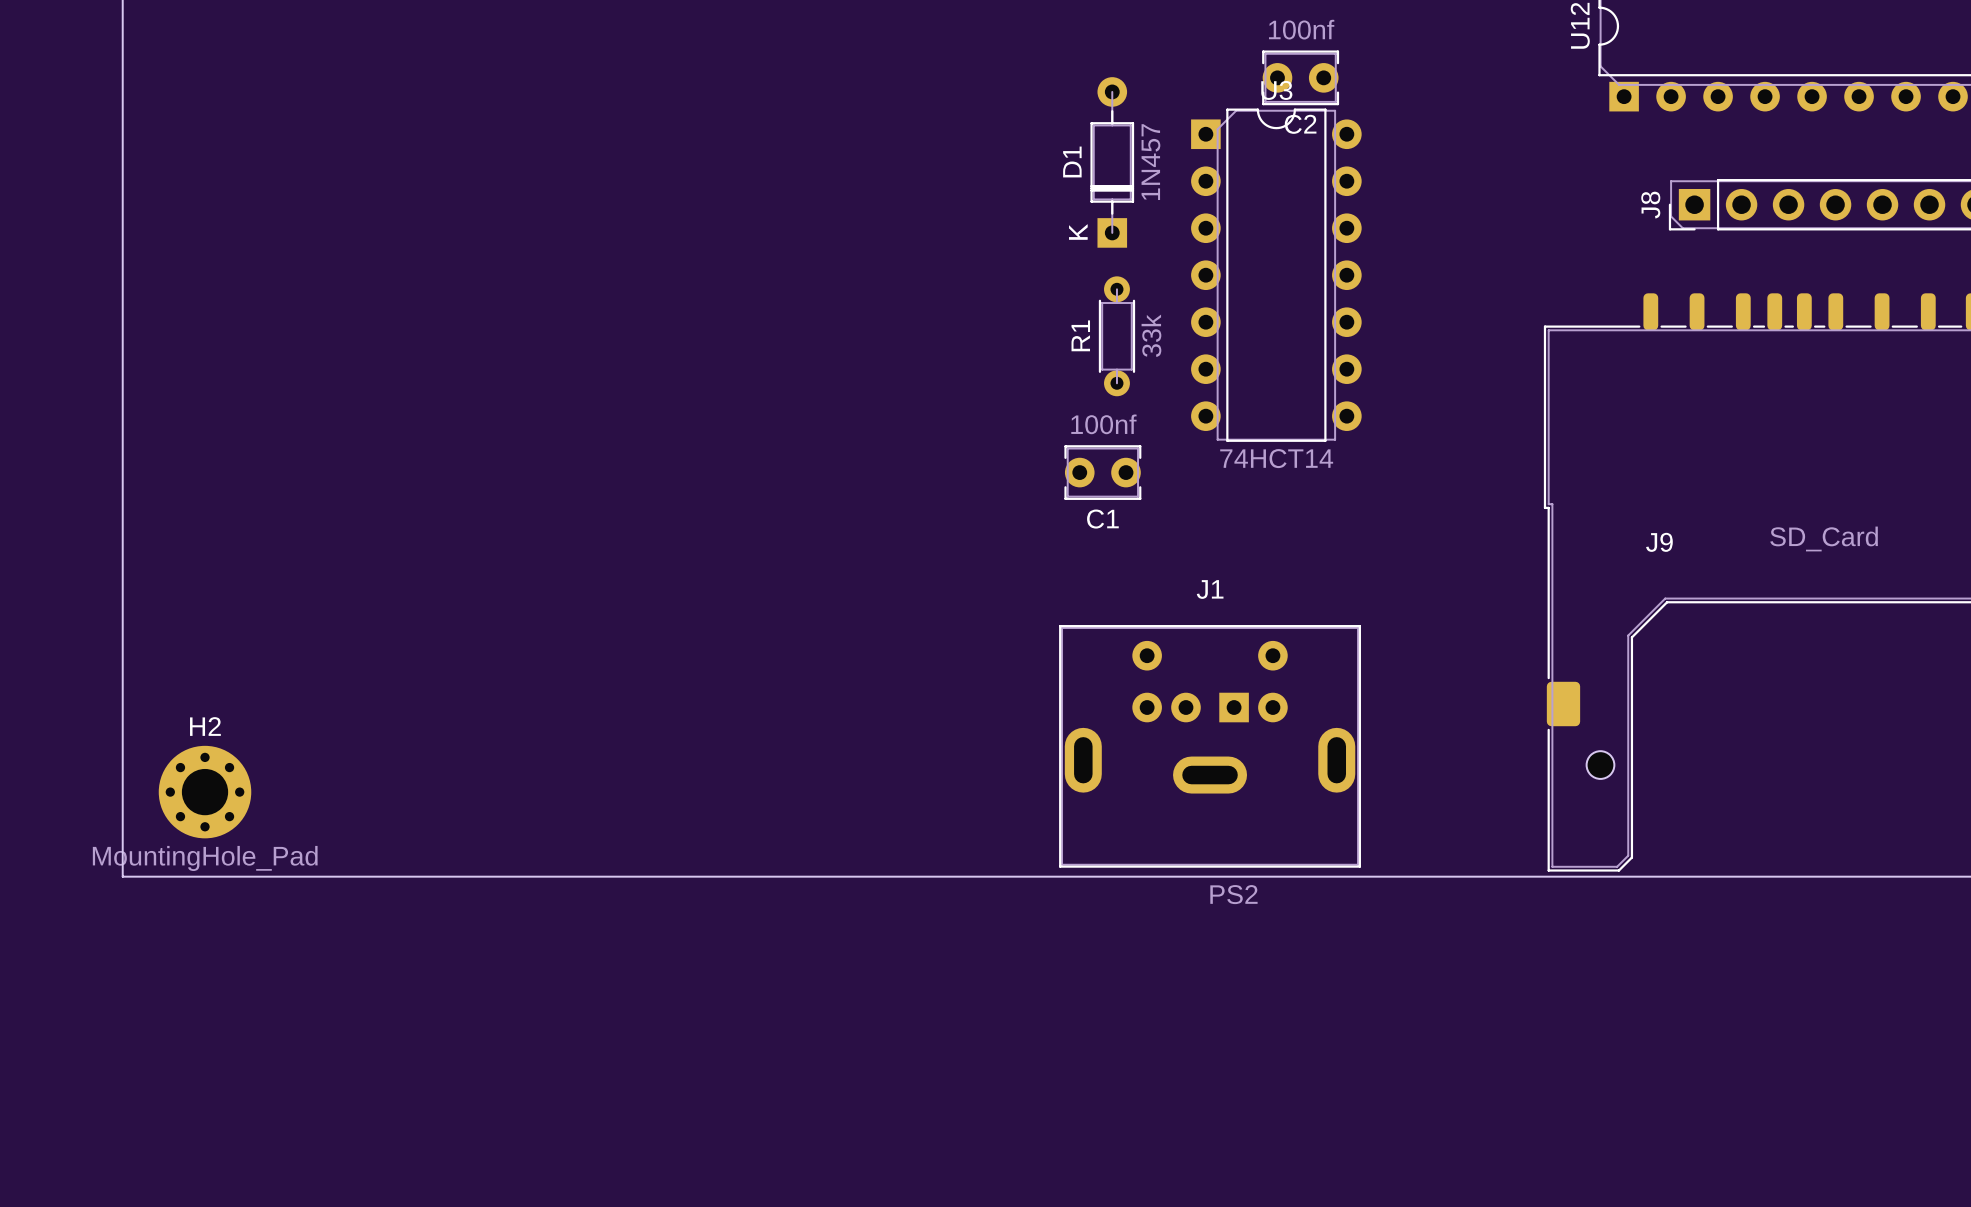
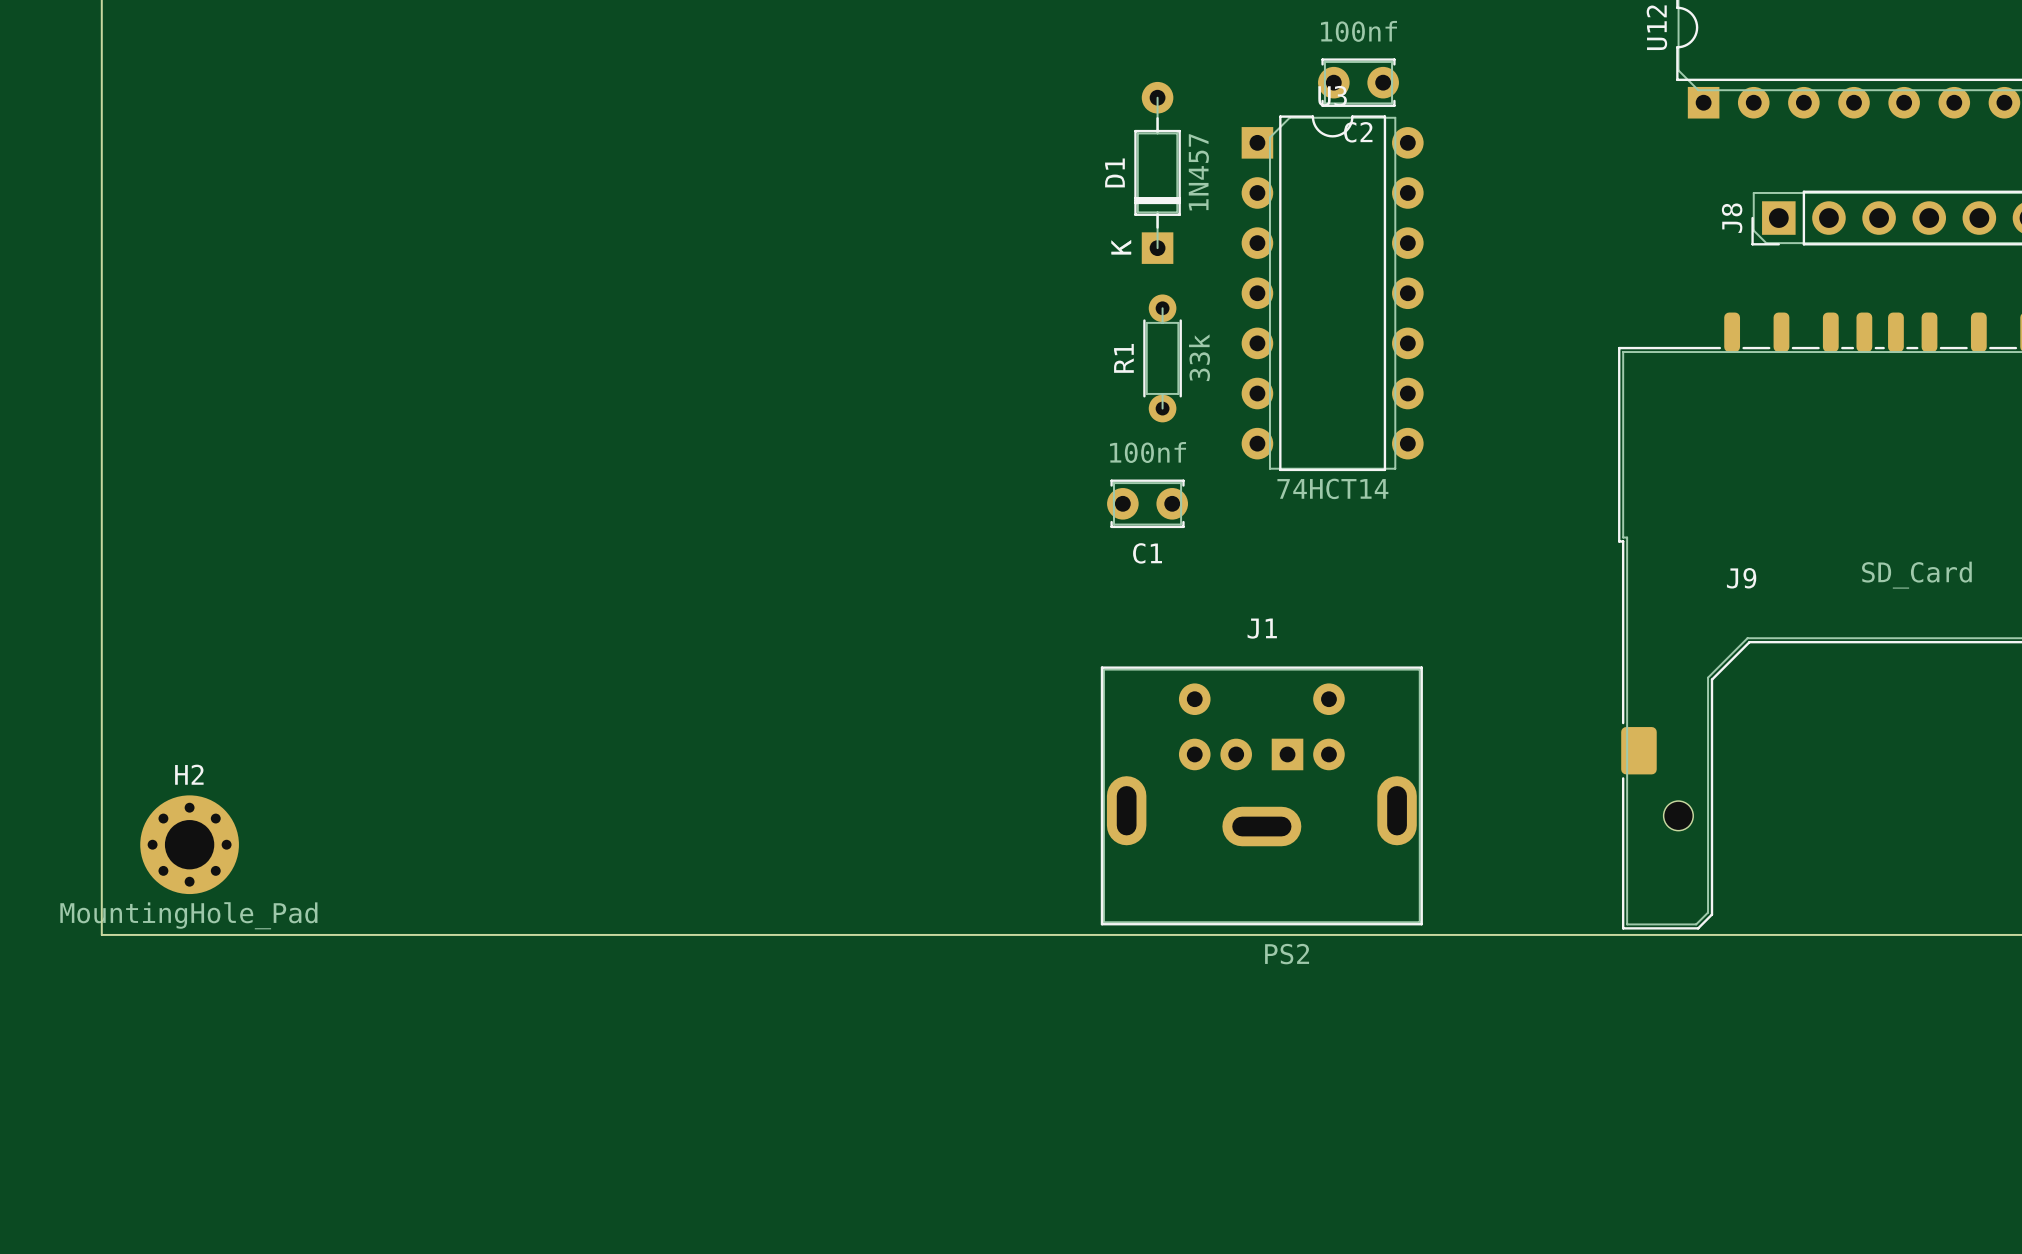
C2 footprint: [1262, 50, 1340, 106] -> [1318, 58, 1399, 107]
C1 footprint: [1064, 445, 1142, 500] -> [1107, 479, 1189, 529]

